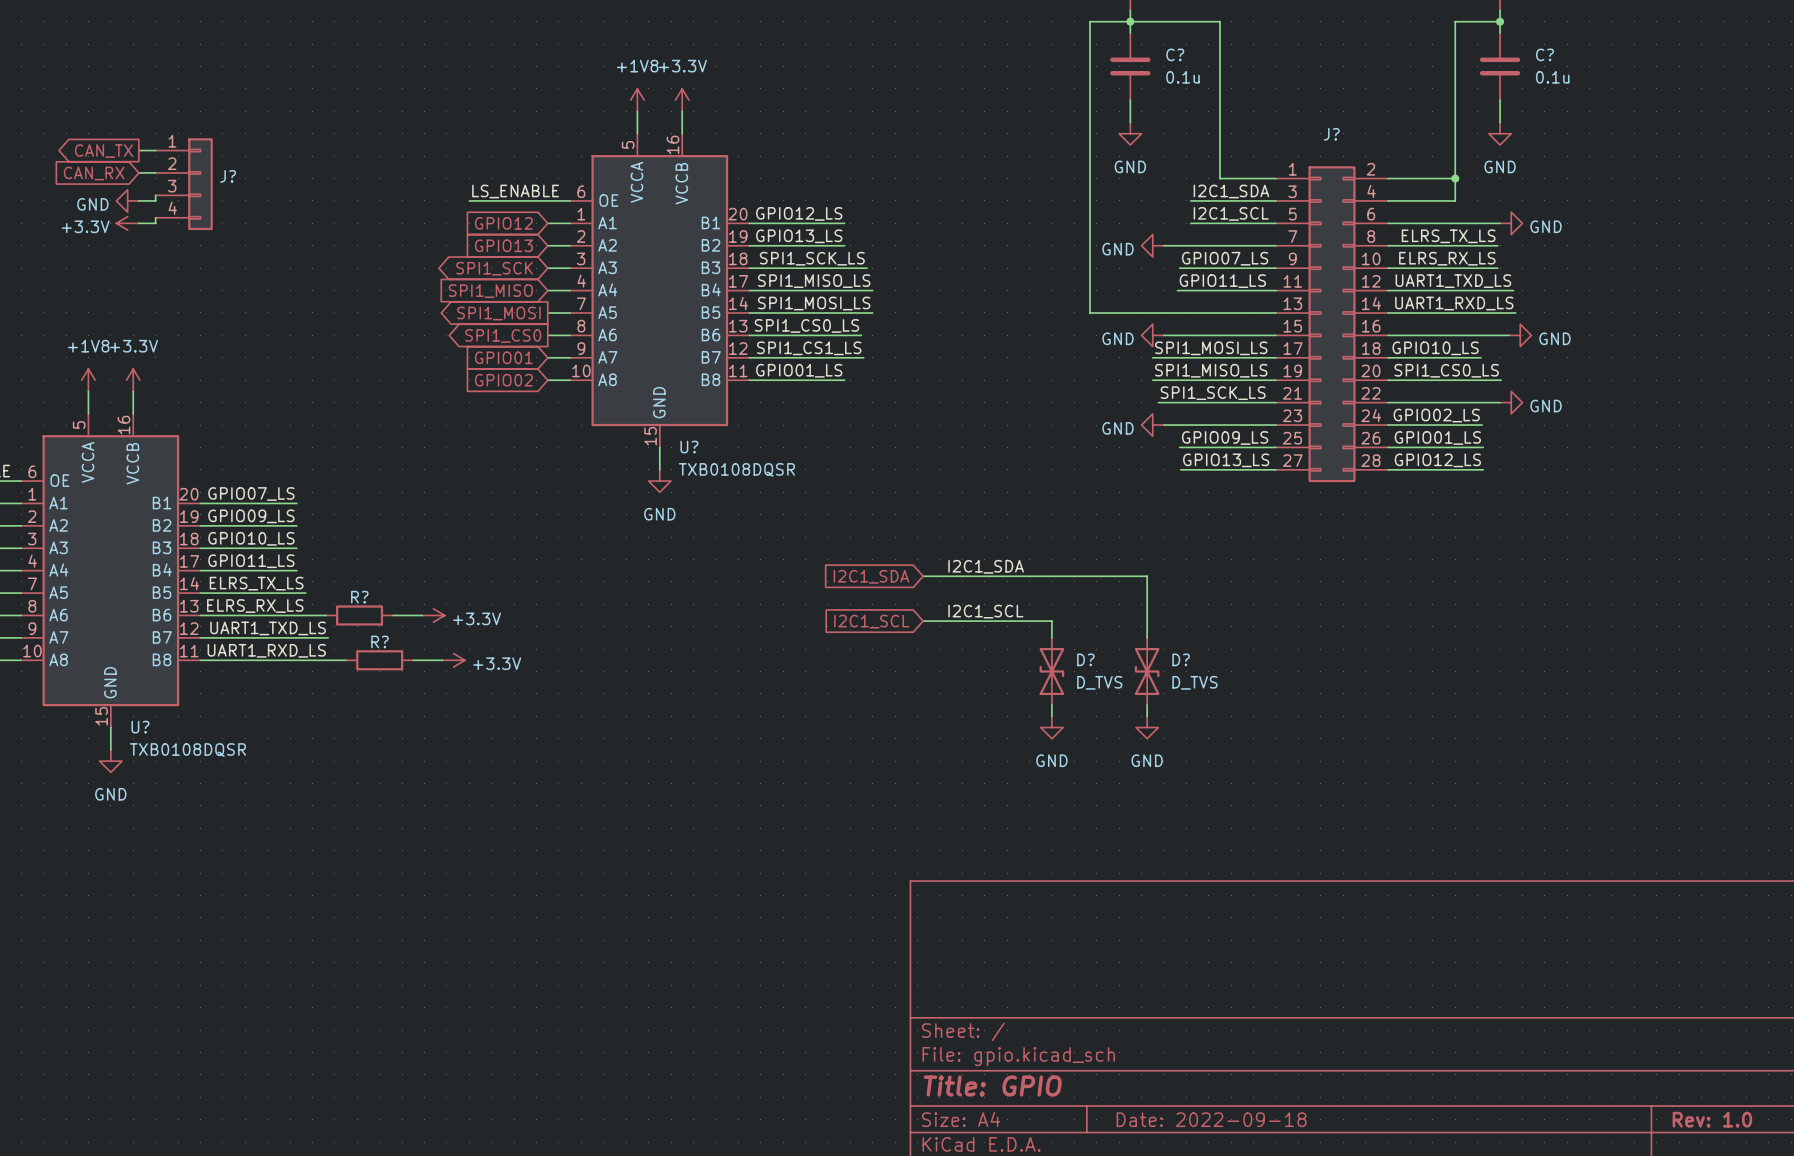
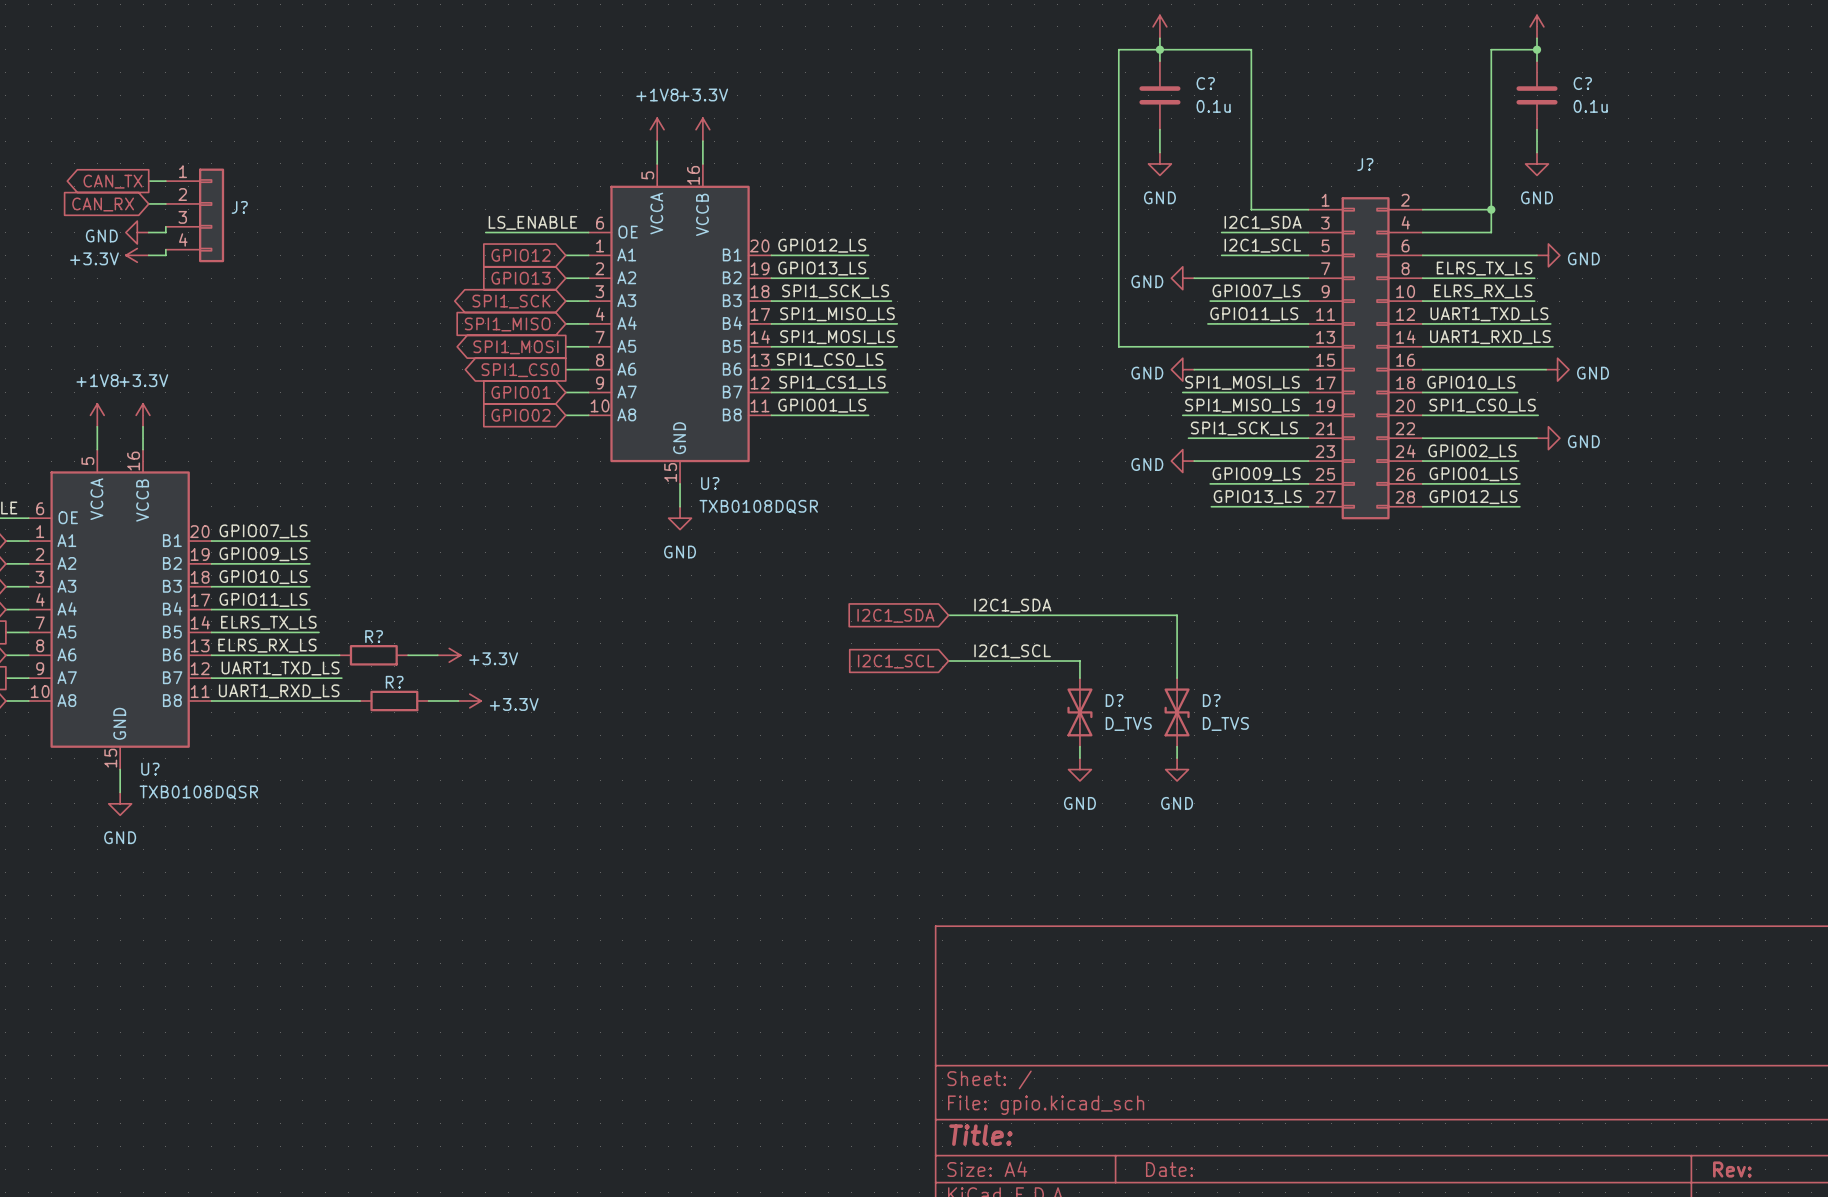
title block: Title: GPIO (992, 1085) -> Title: (980, 1135)
title block: Date: 2022-09-18 (1211, 1119) -> Date: (1169, 1169)
title block: Rev: 1.0 (1712, 1119) -> Rev: (1732, 1169)

